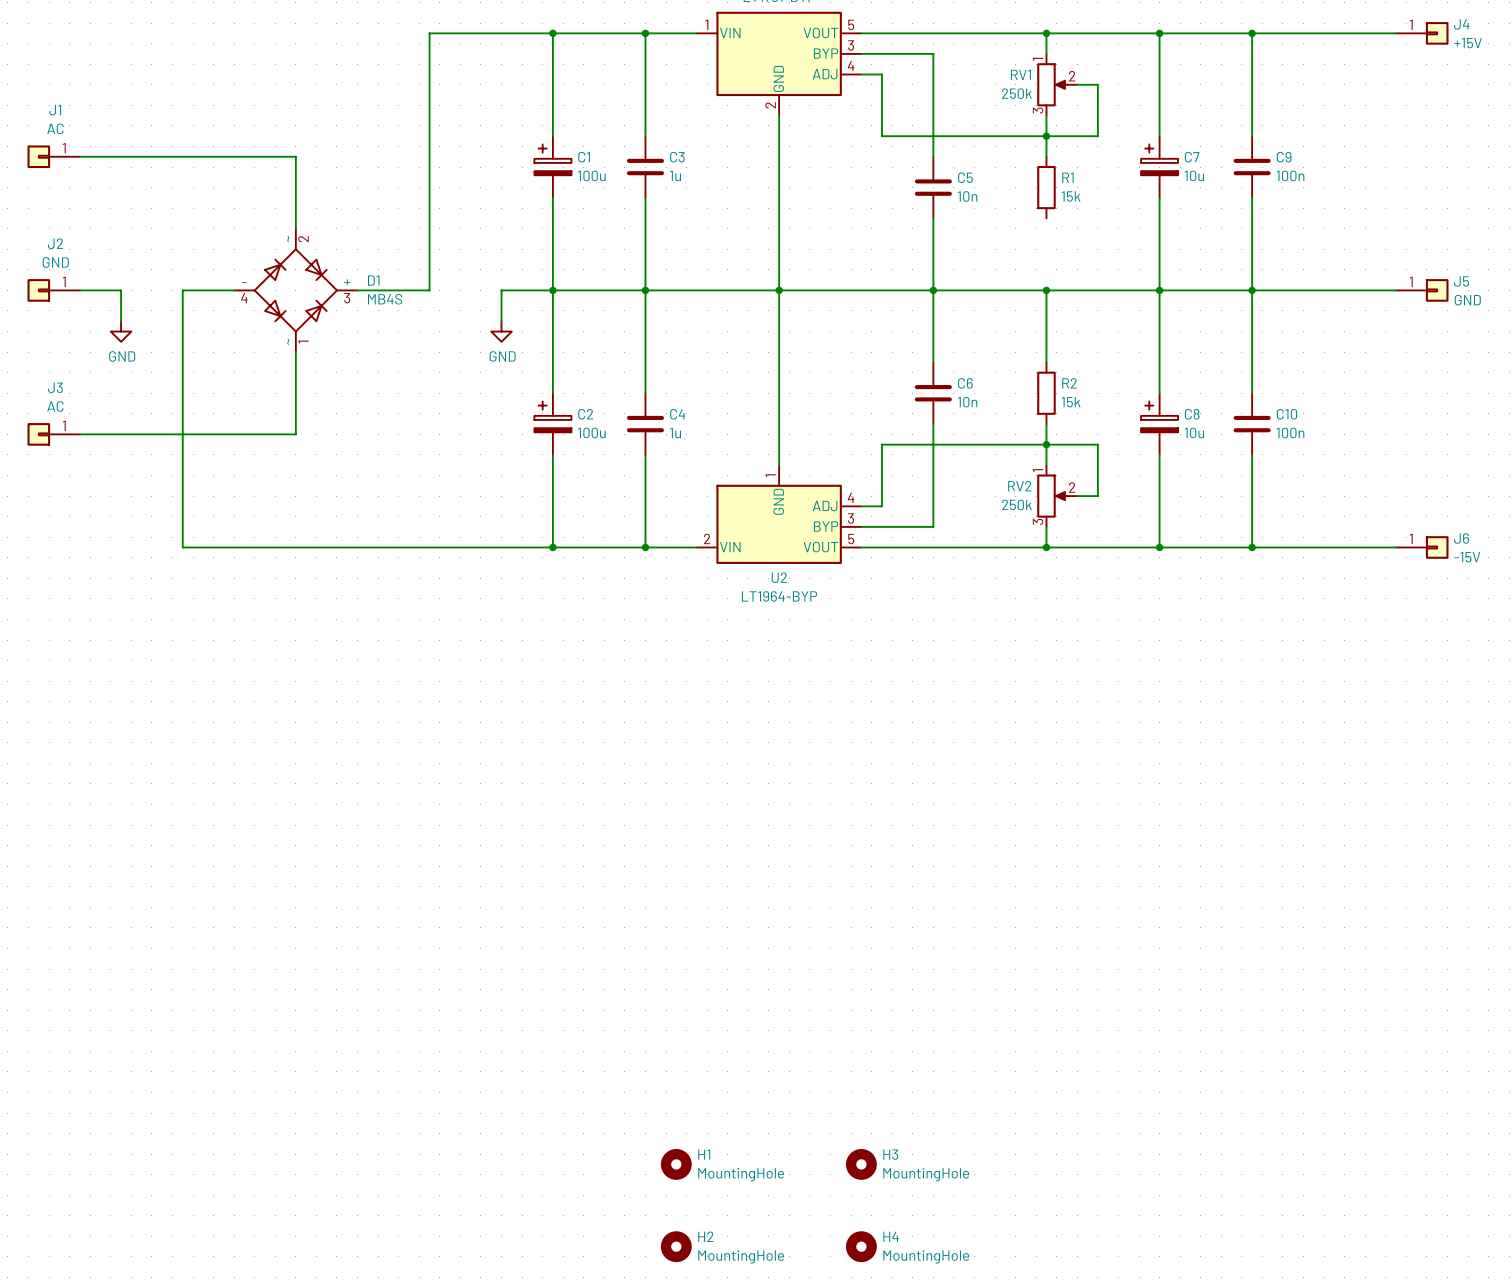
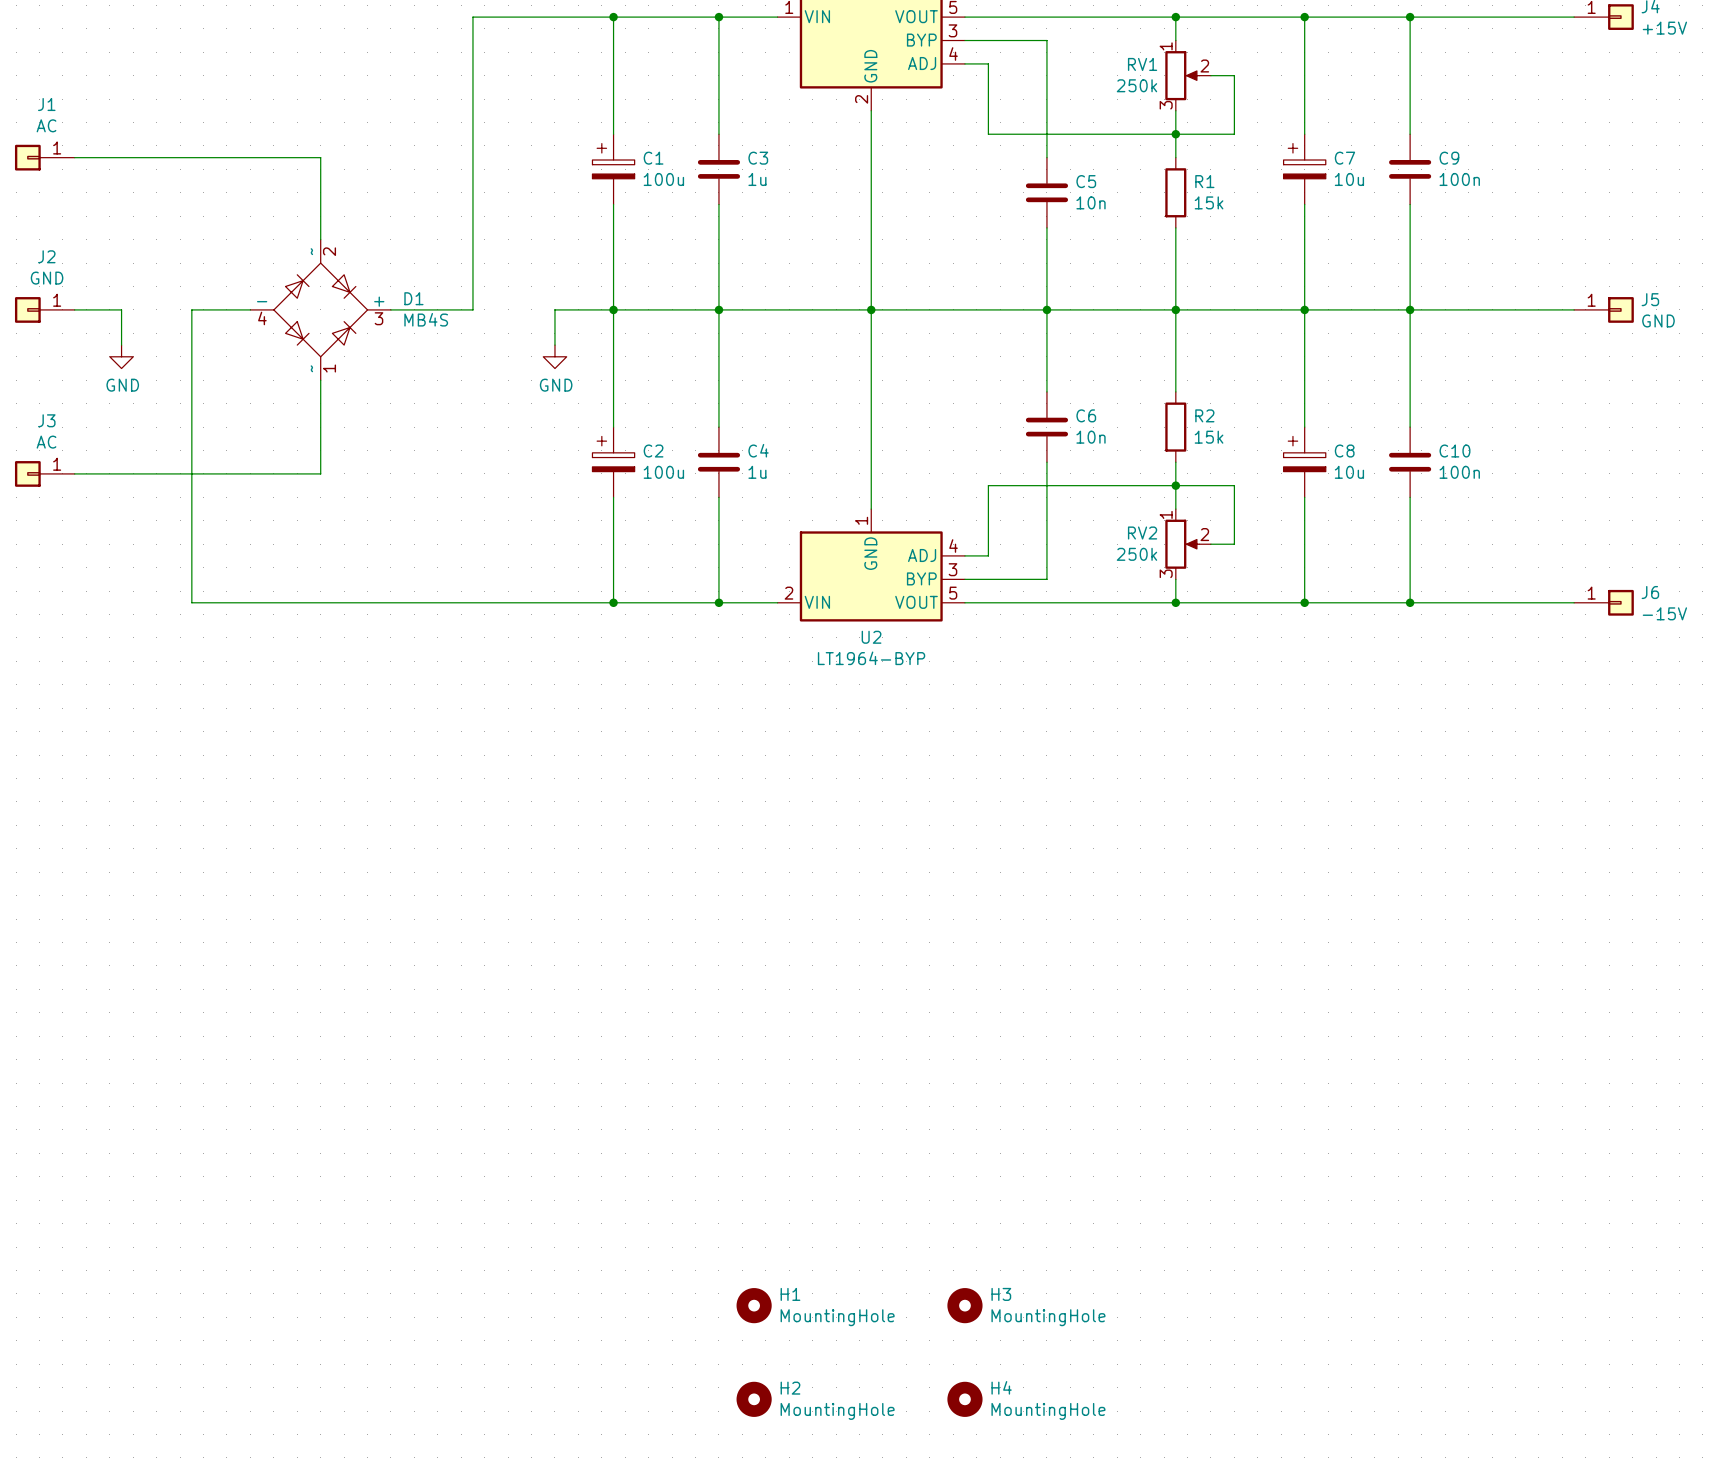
wire: none -> (1175, 227) (1175, 309)

